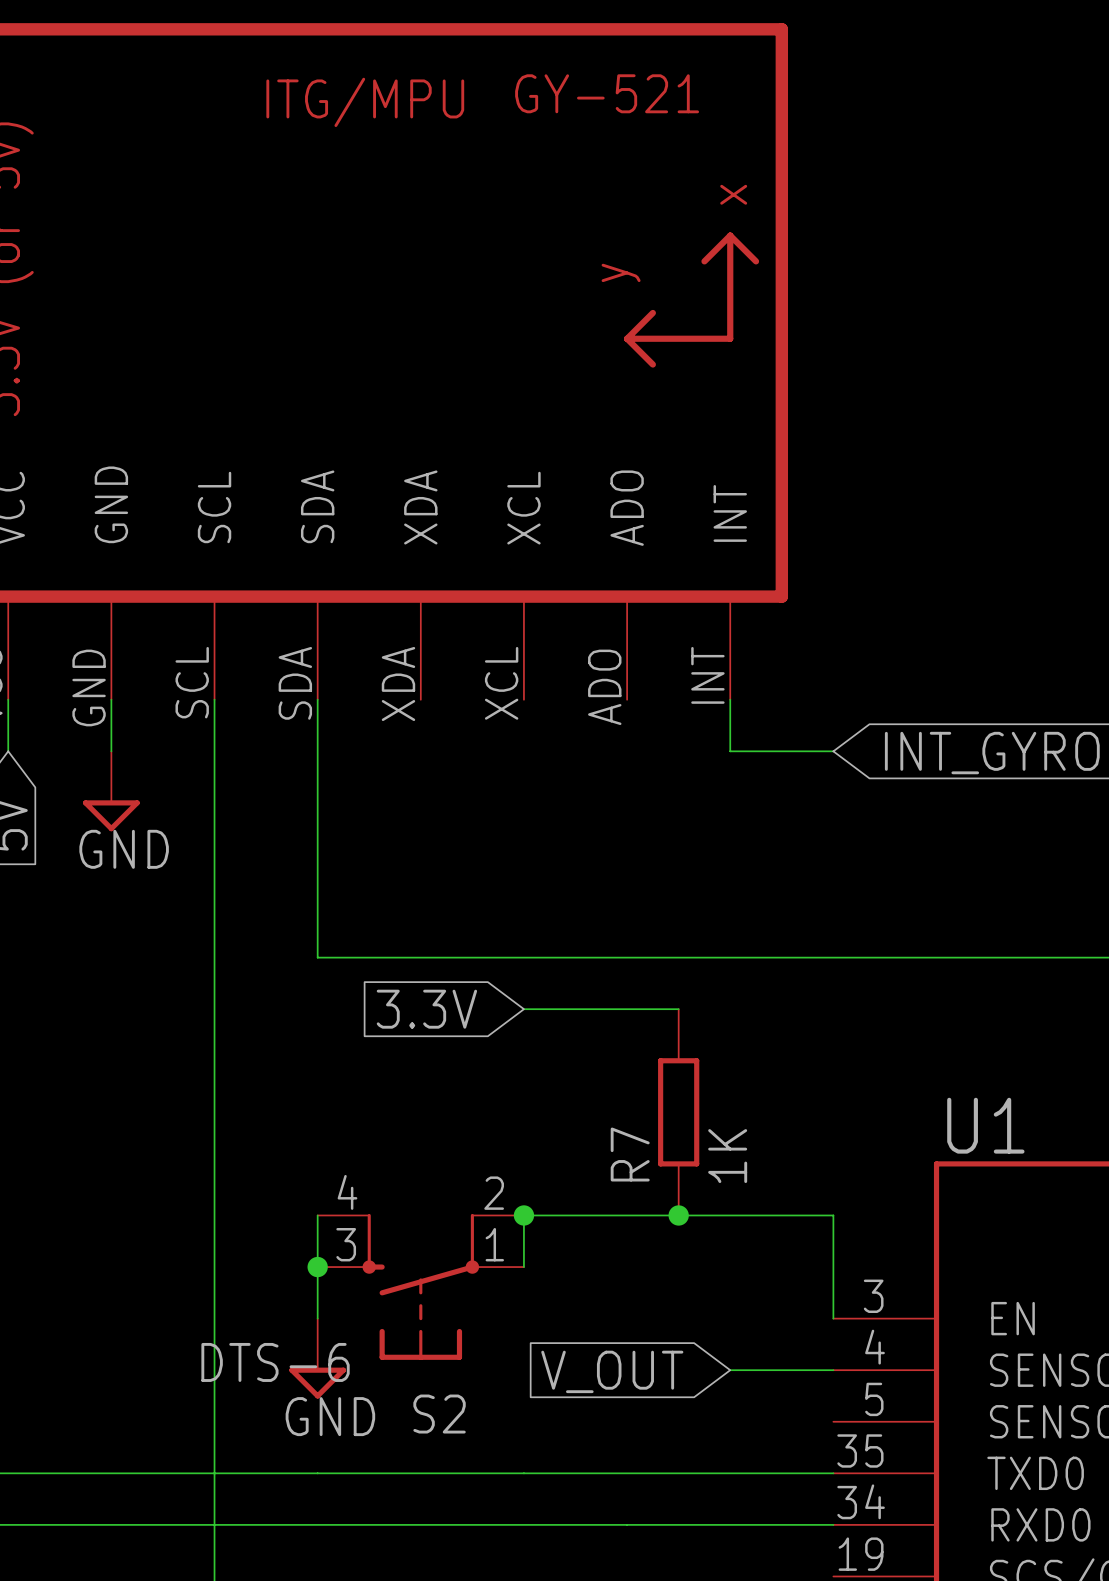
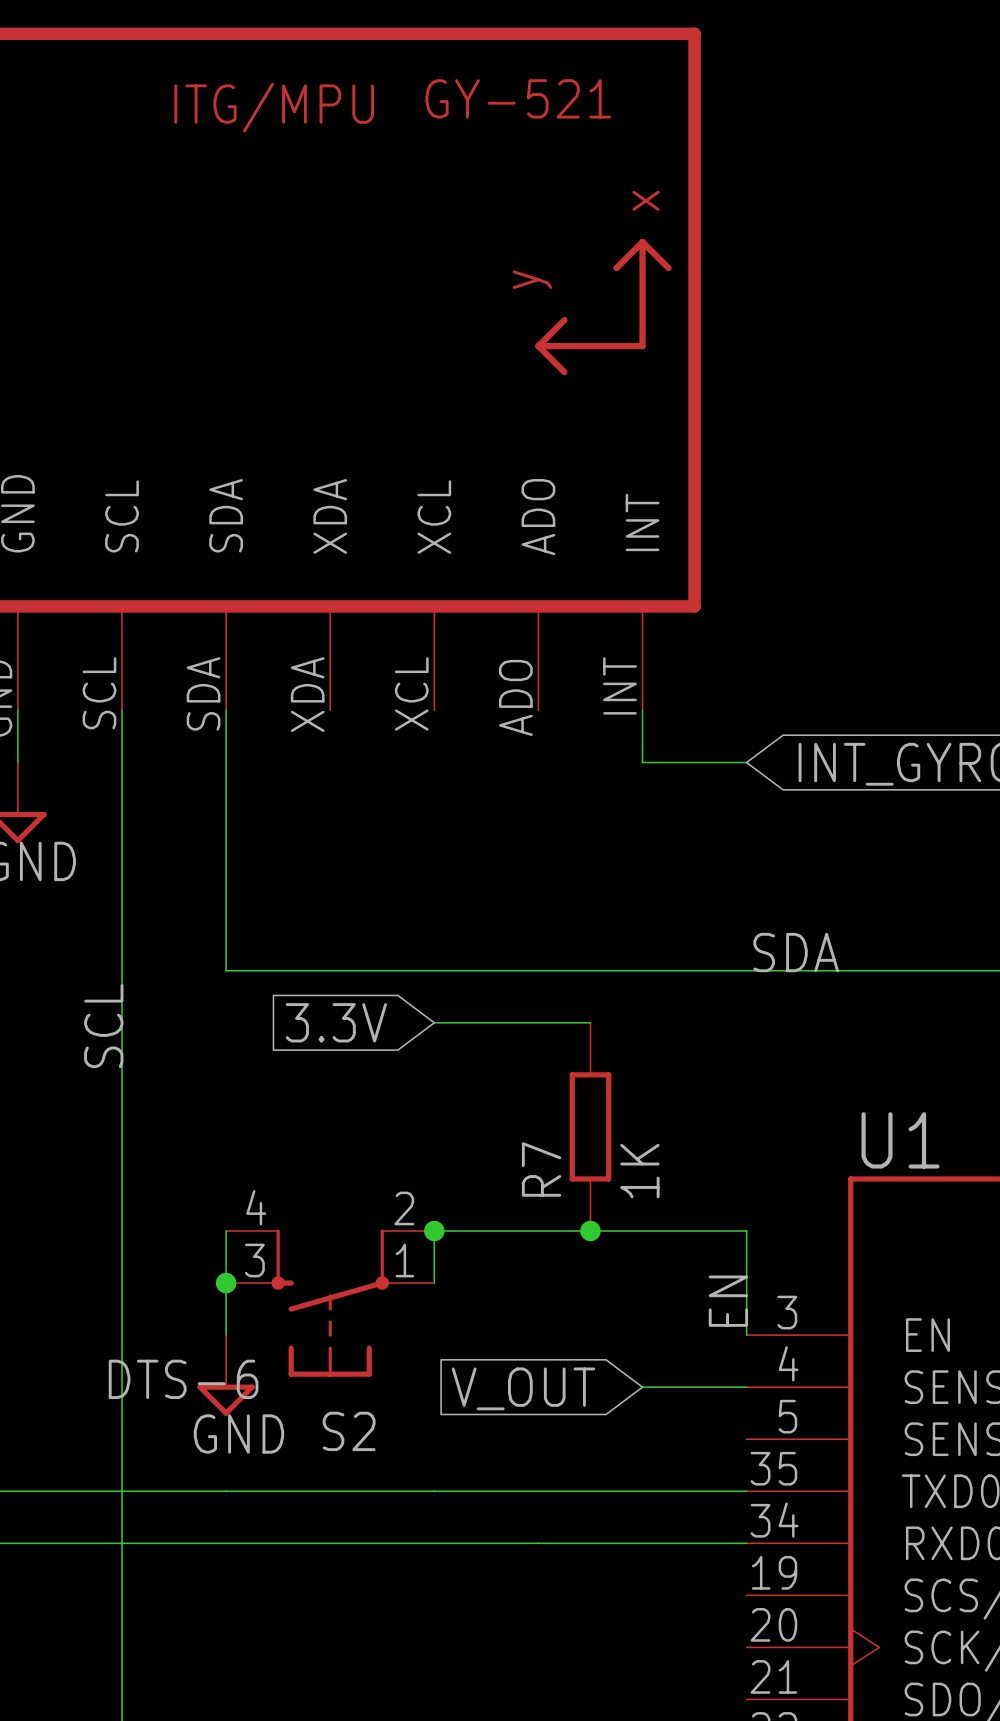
label: none -> SDA (796, 952)
label: none -> SCL (103, 1026)
label: none -> EN (728, 1301)

